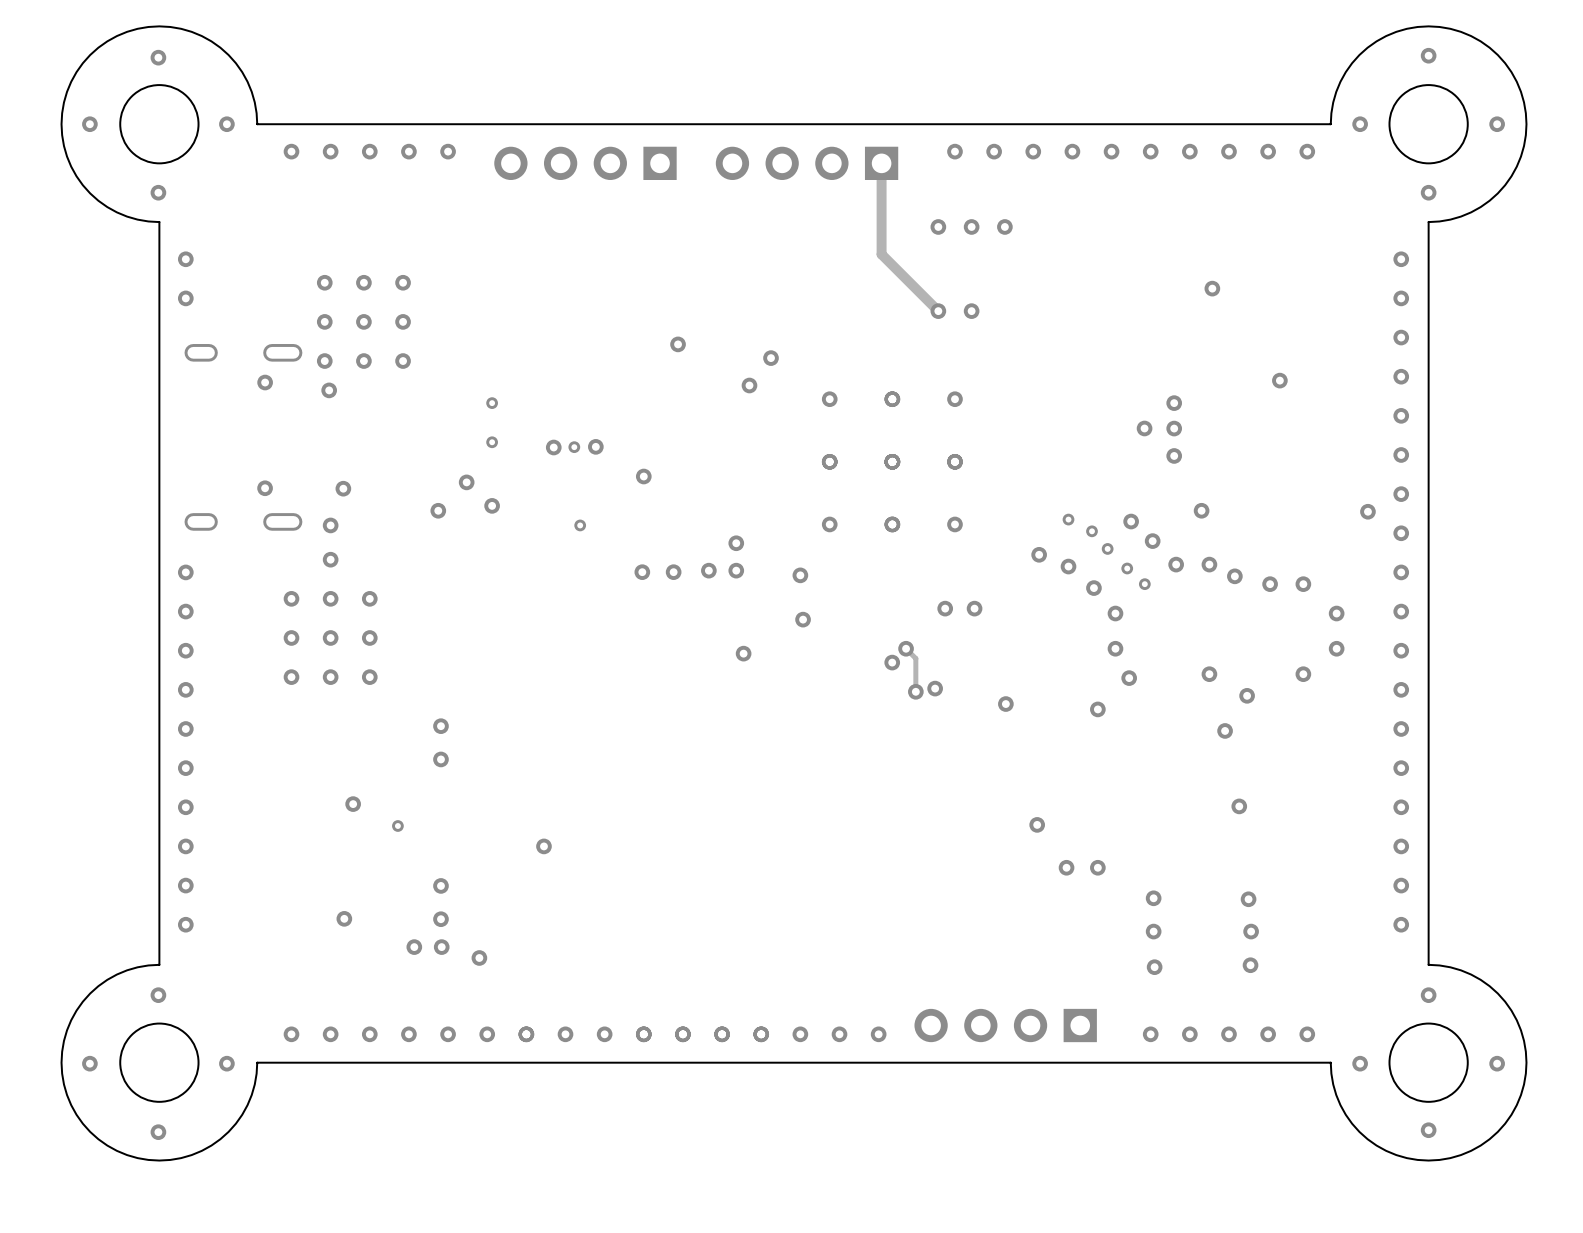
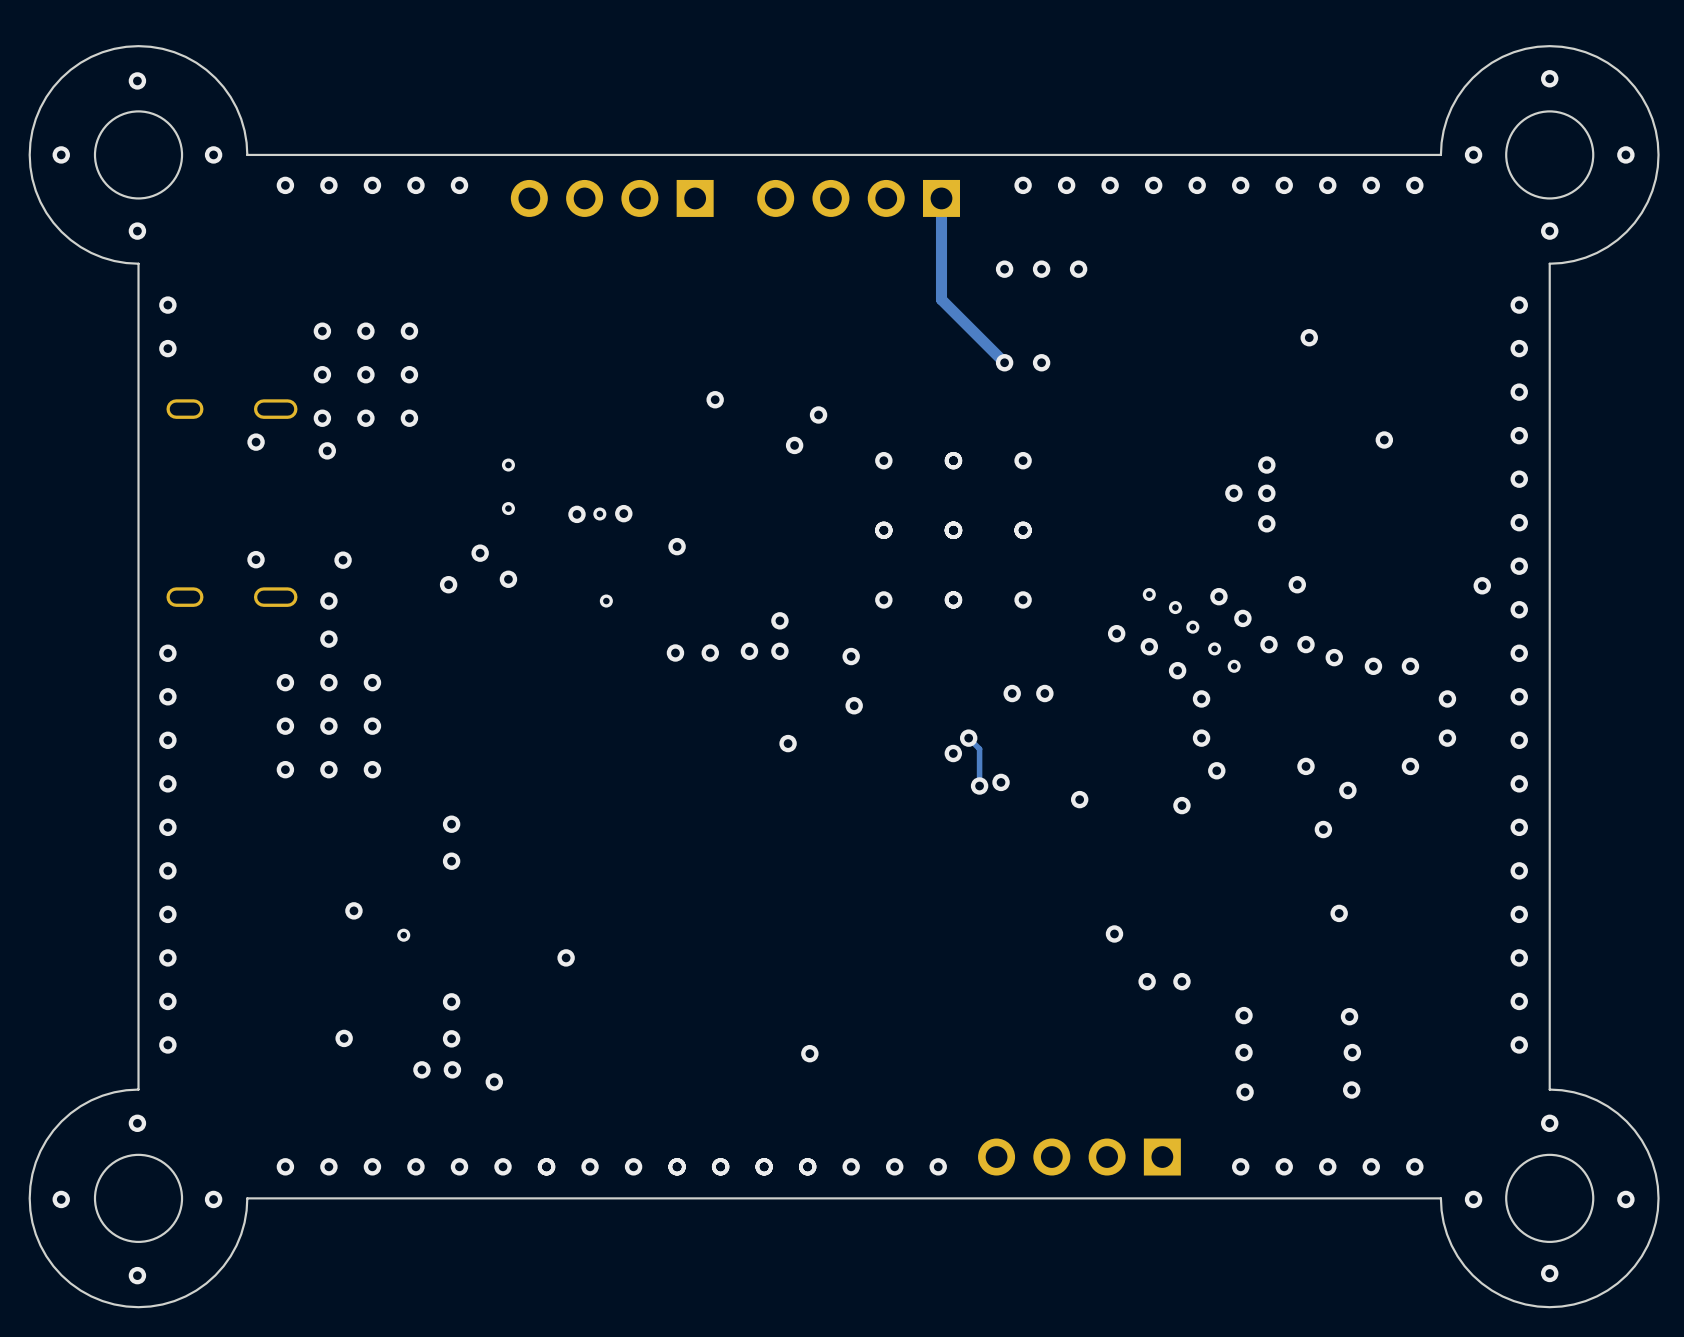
via: none -> (809, 1053)

